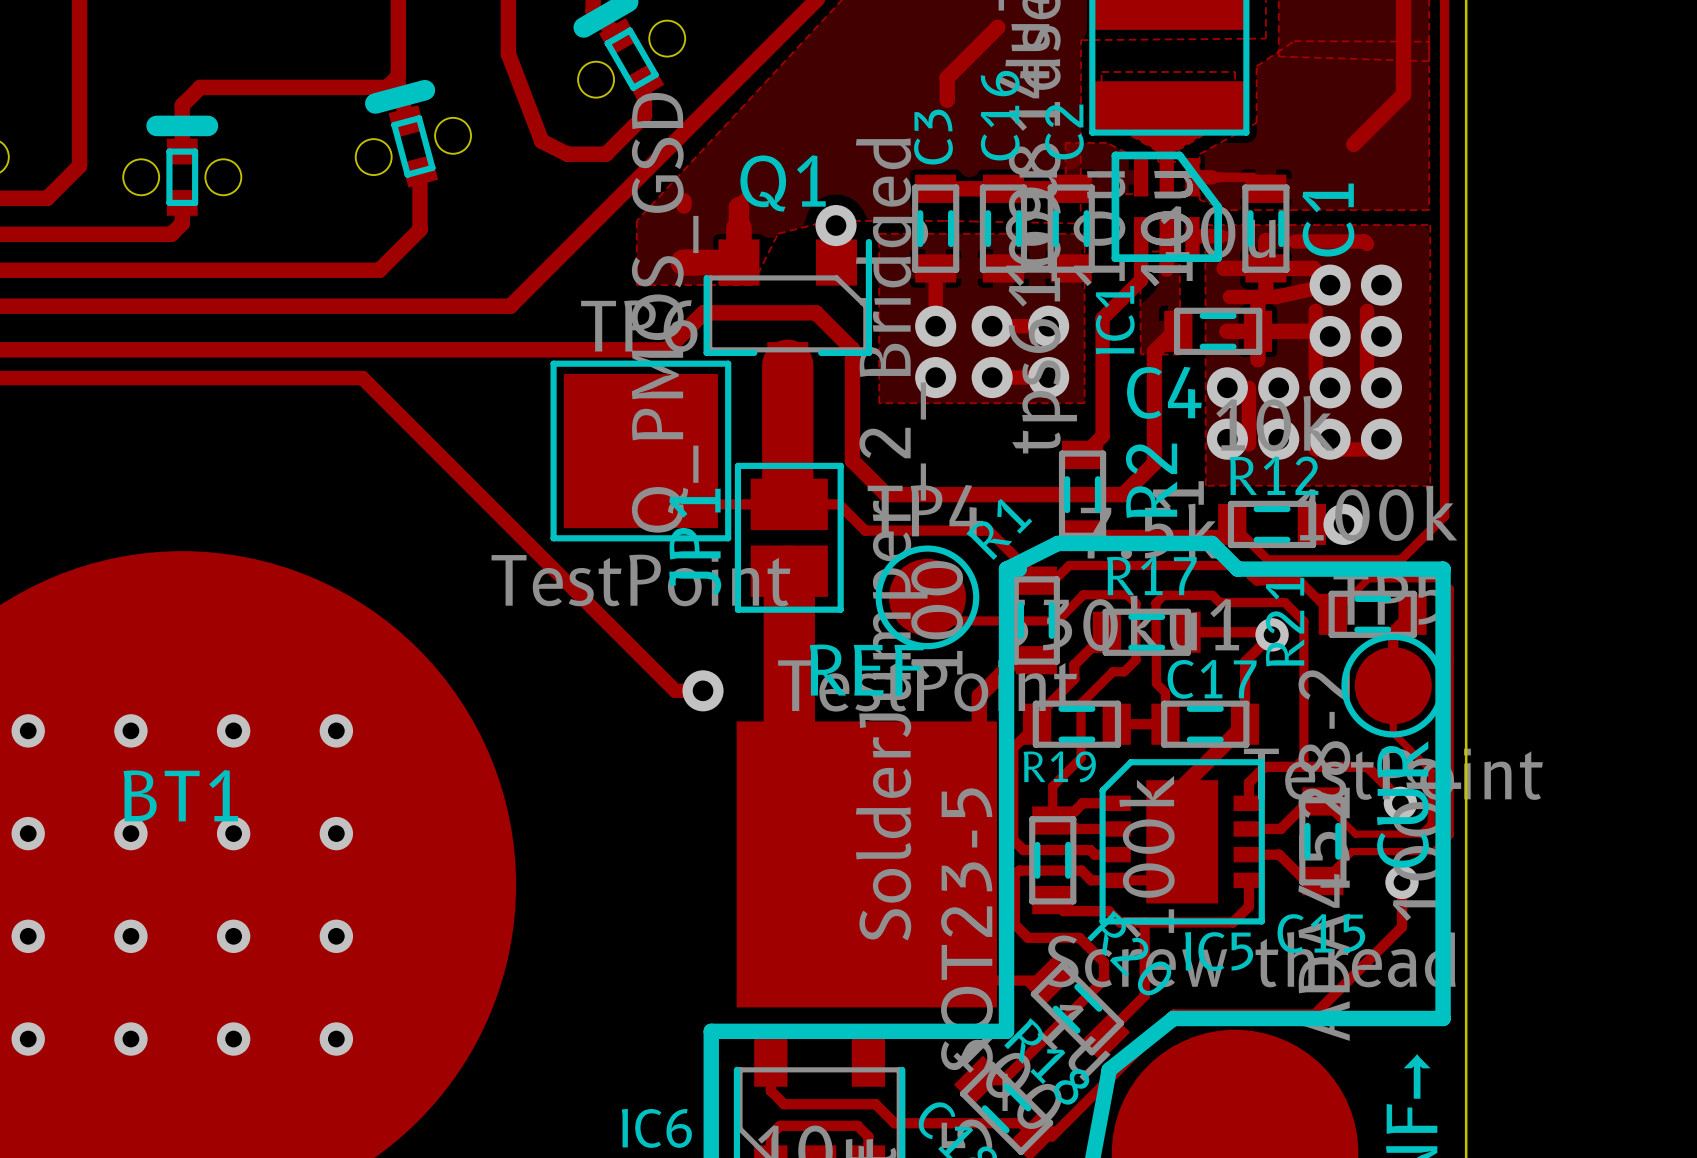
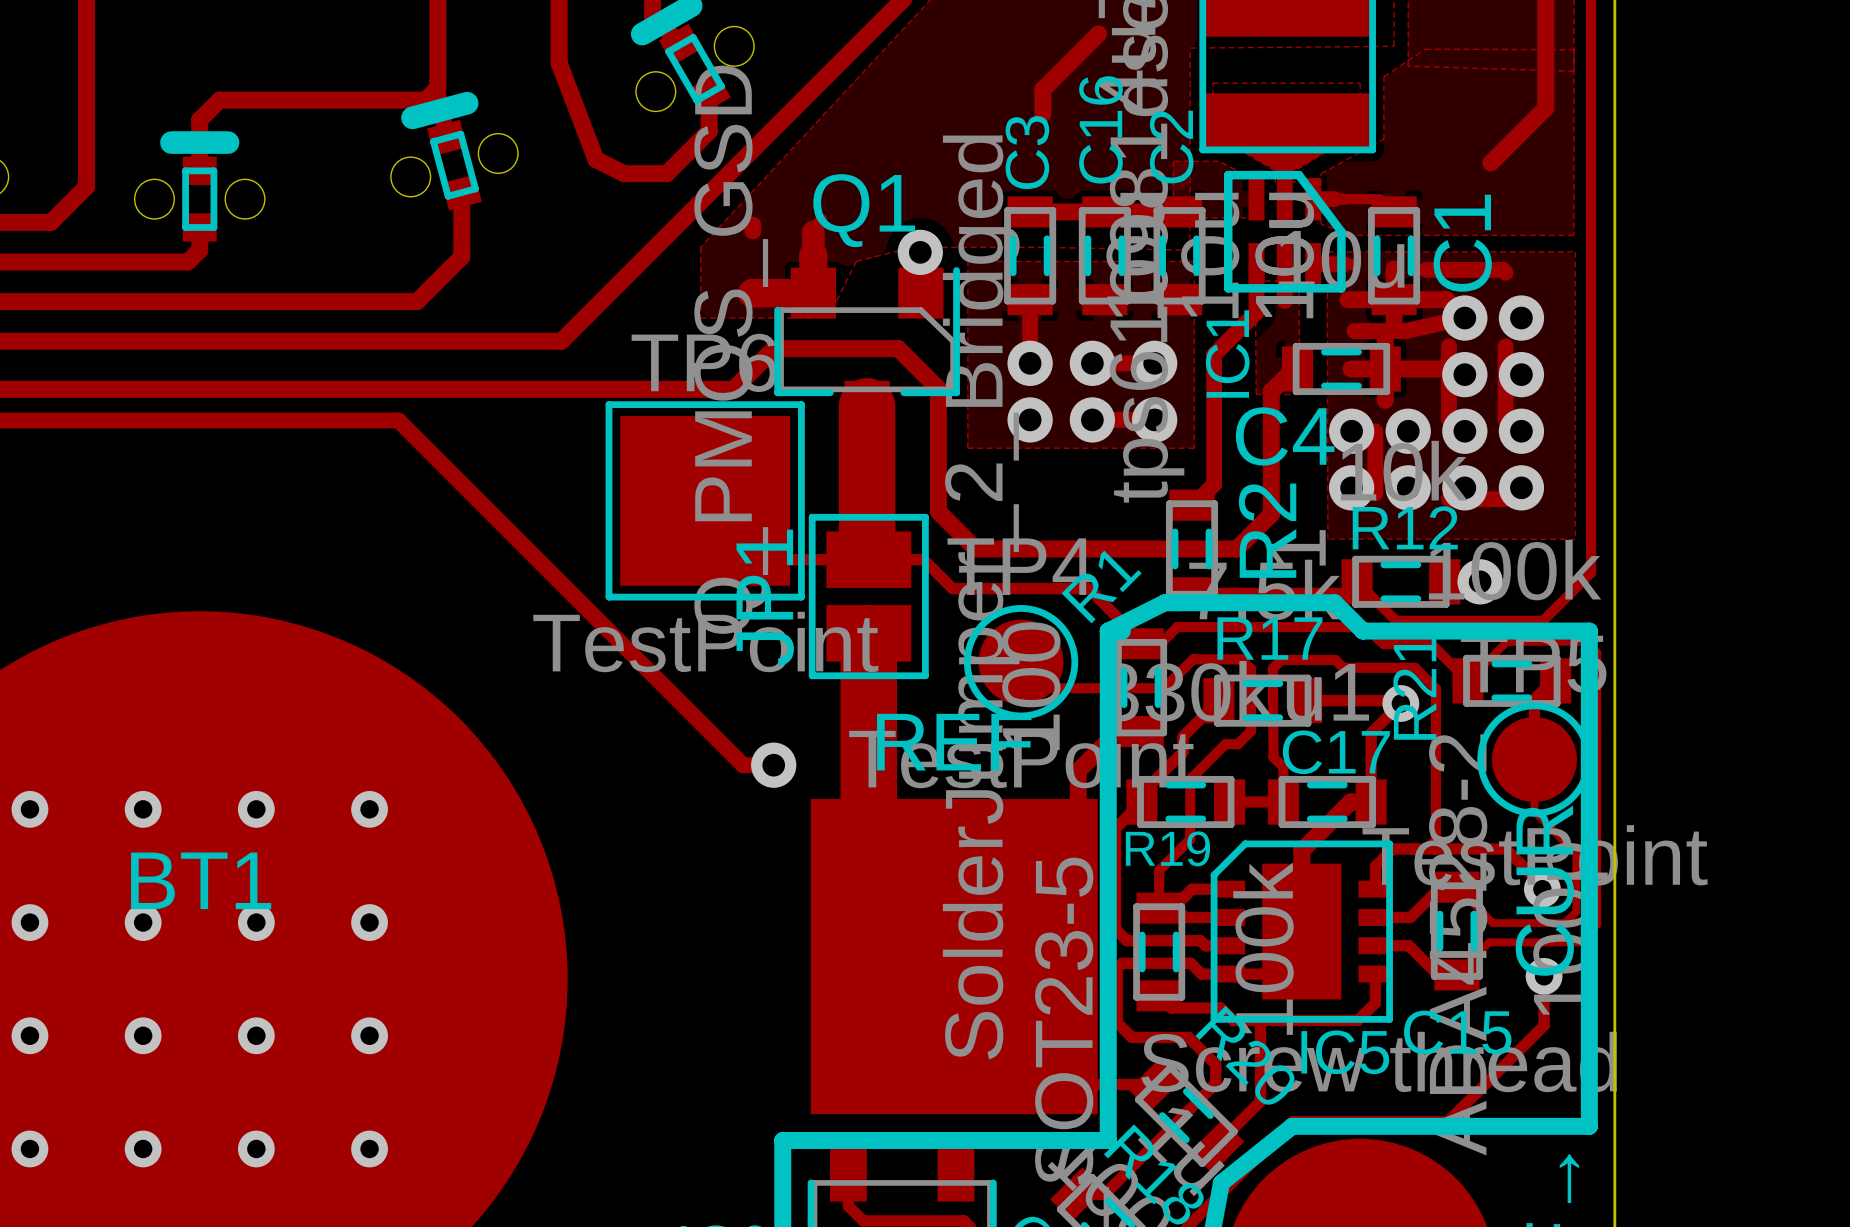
track: (1245, 724) (1182, 787) -> (1371, 802) (1350, 802) (1304, 848) (1301, 848) (1301, 871)

